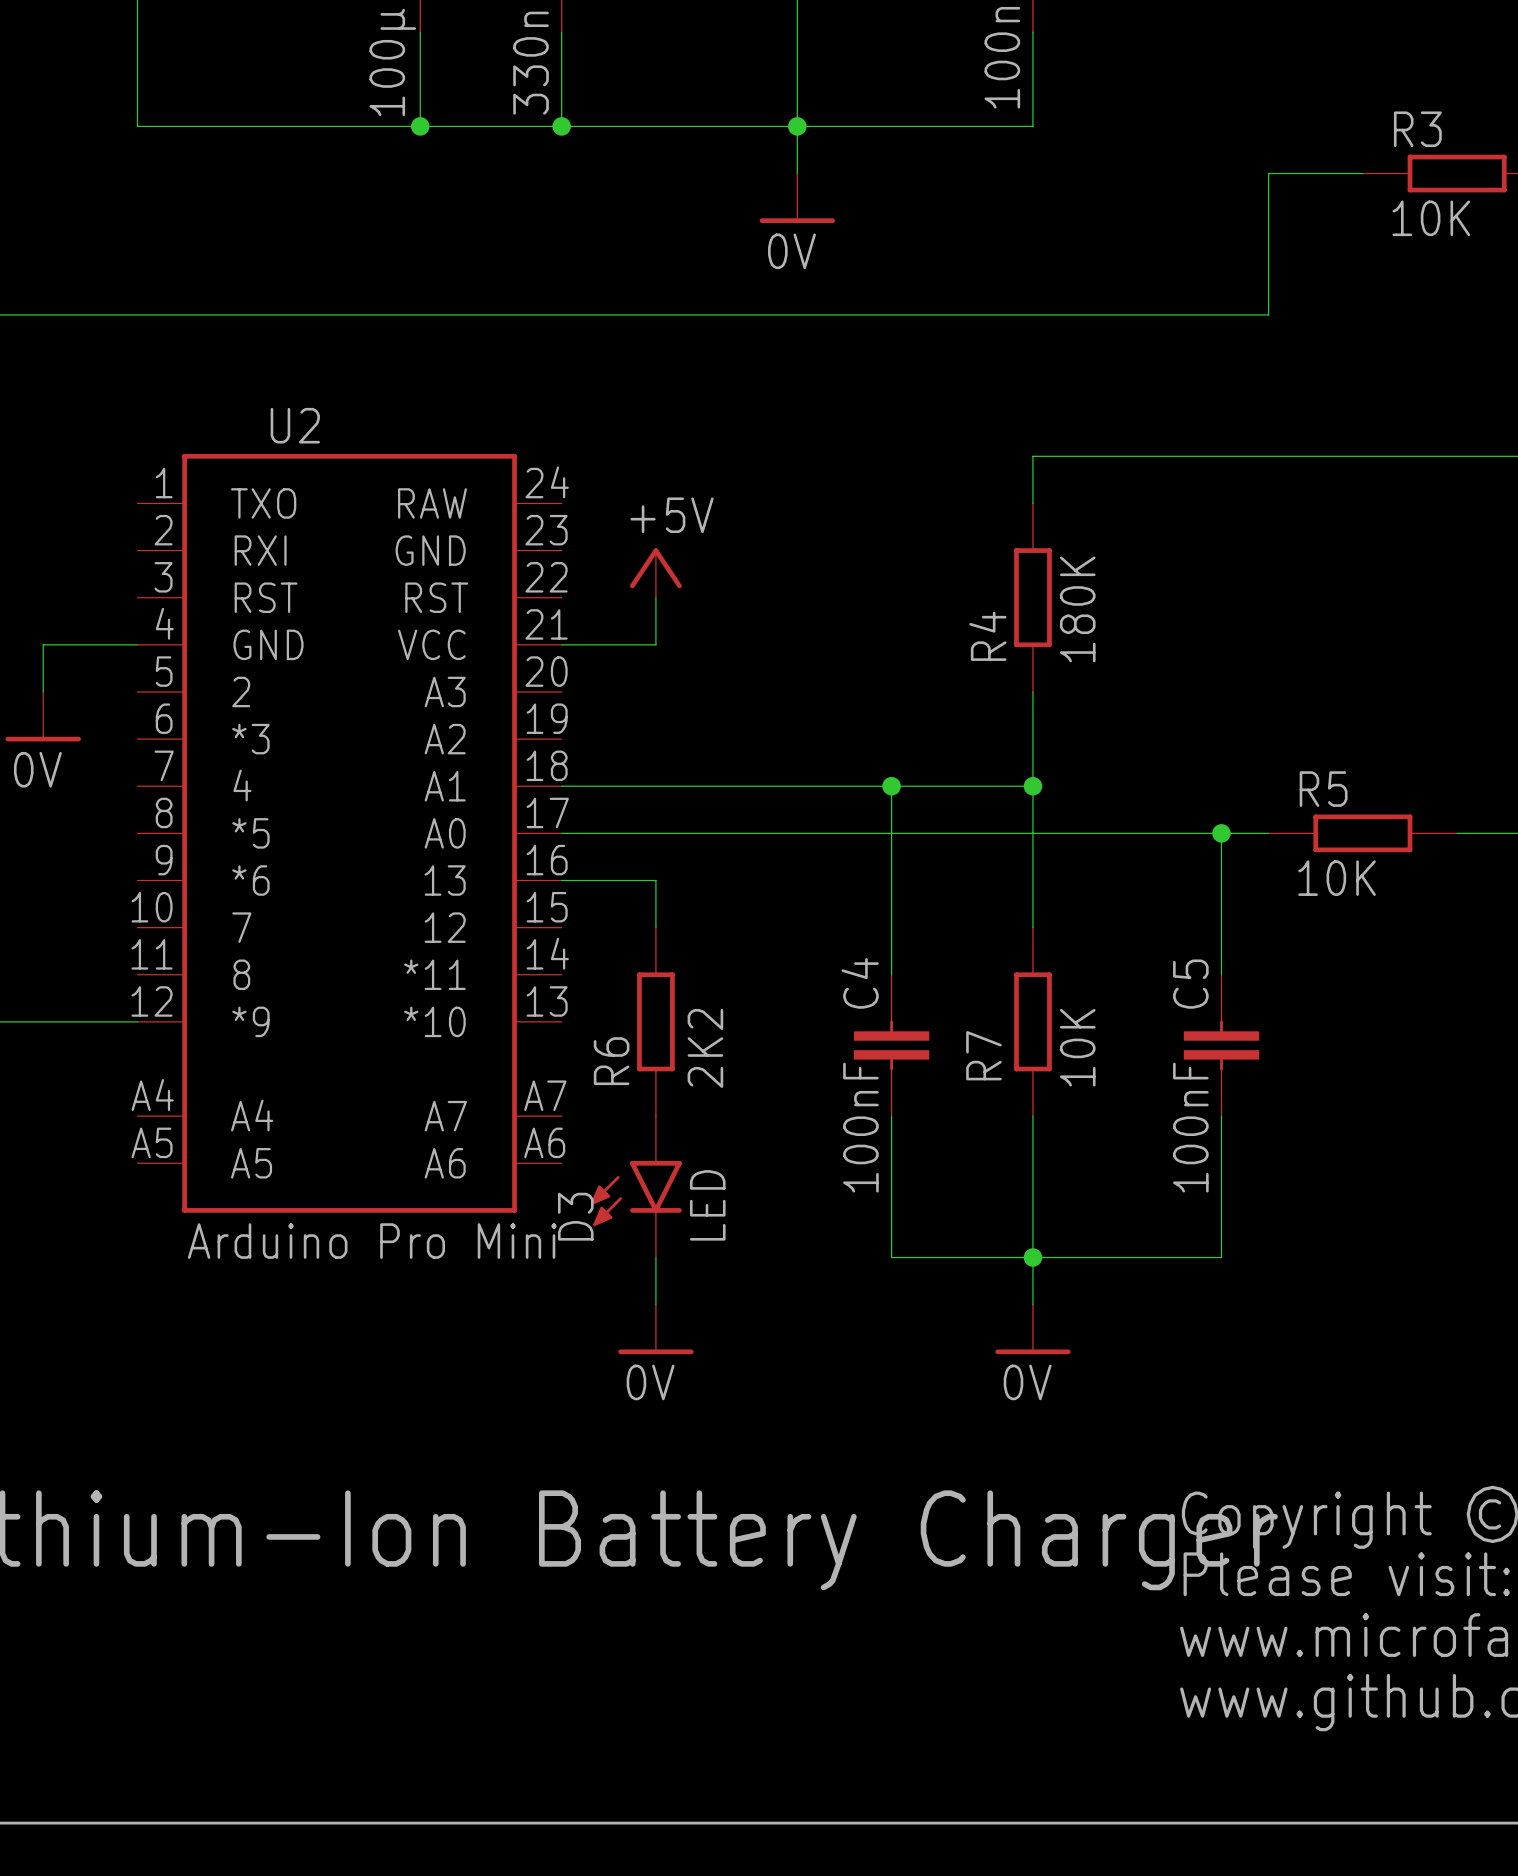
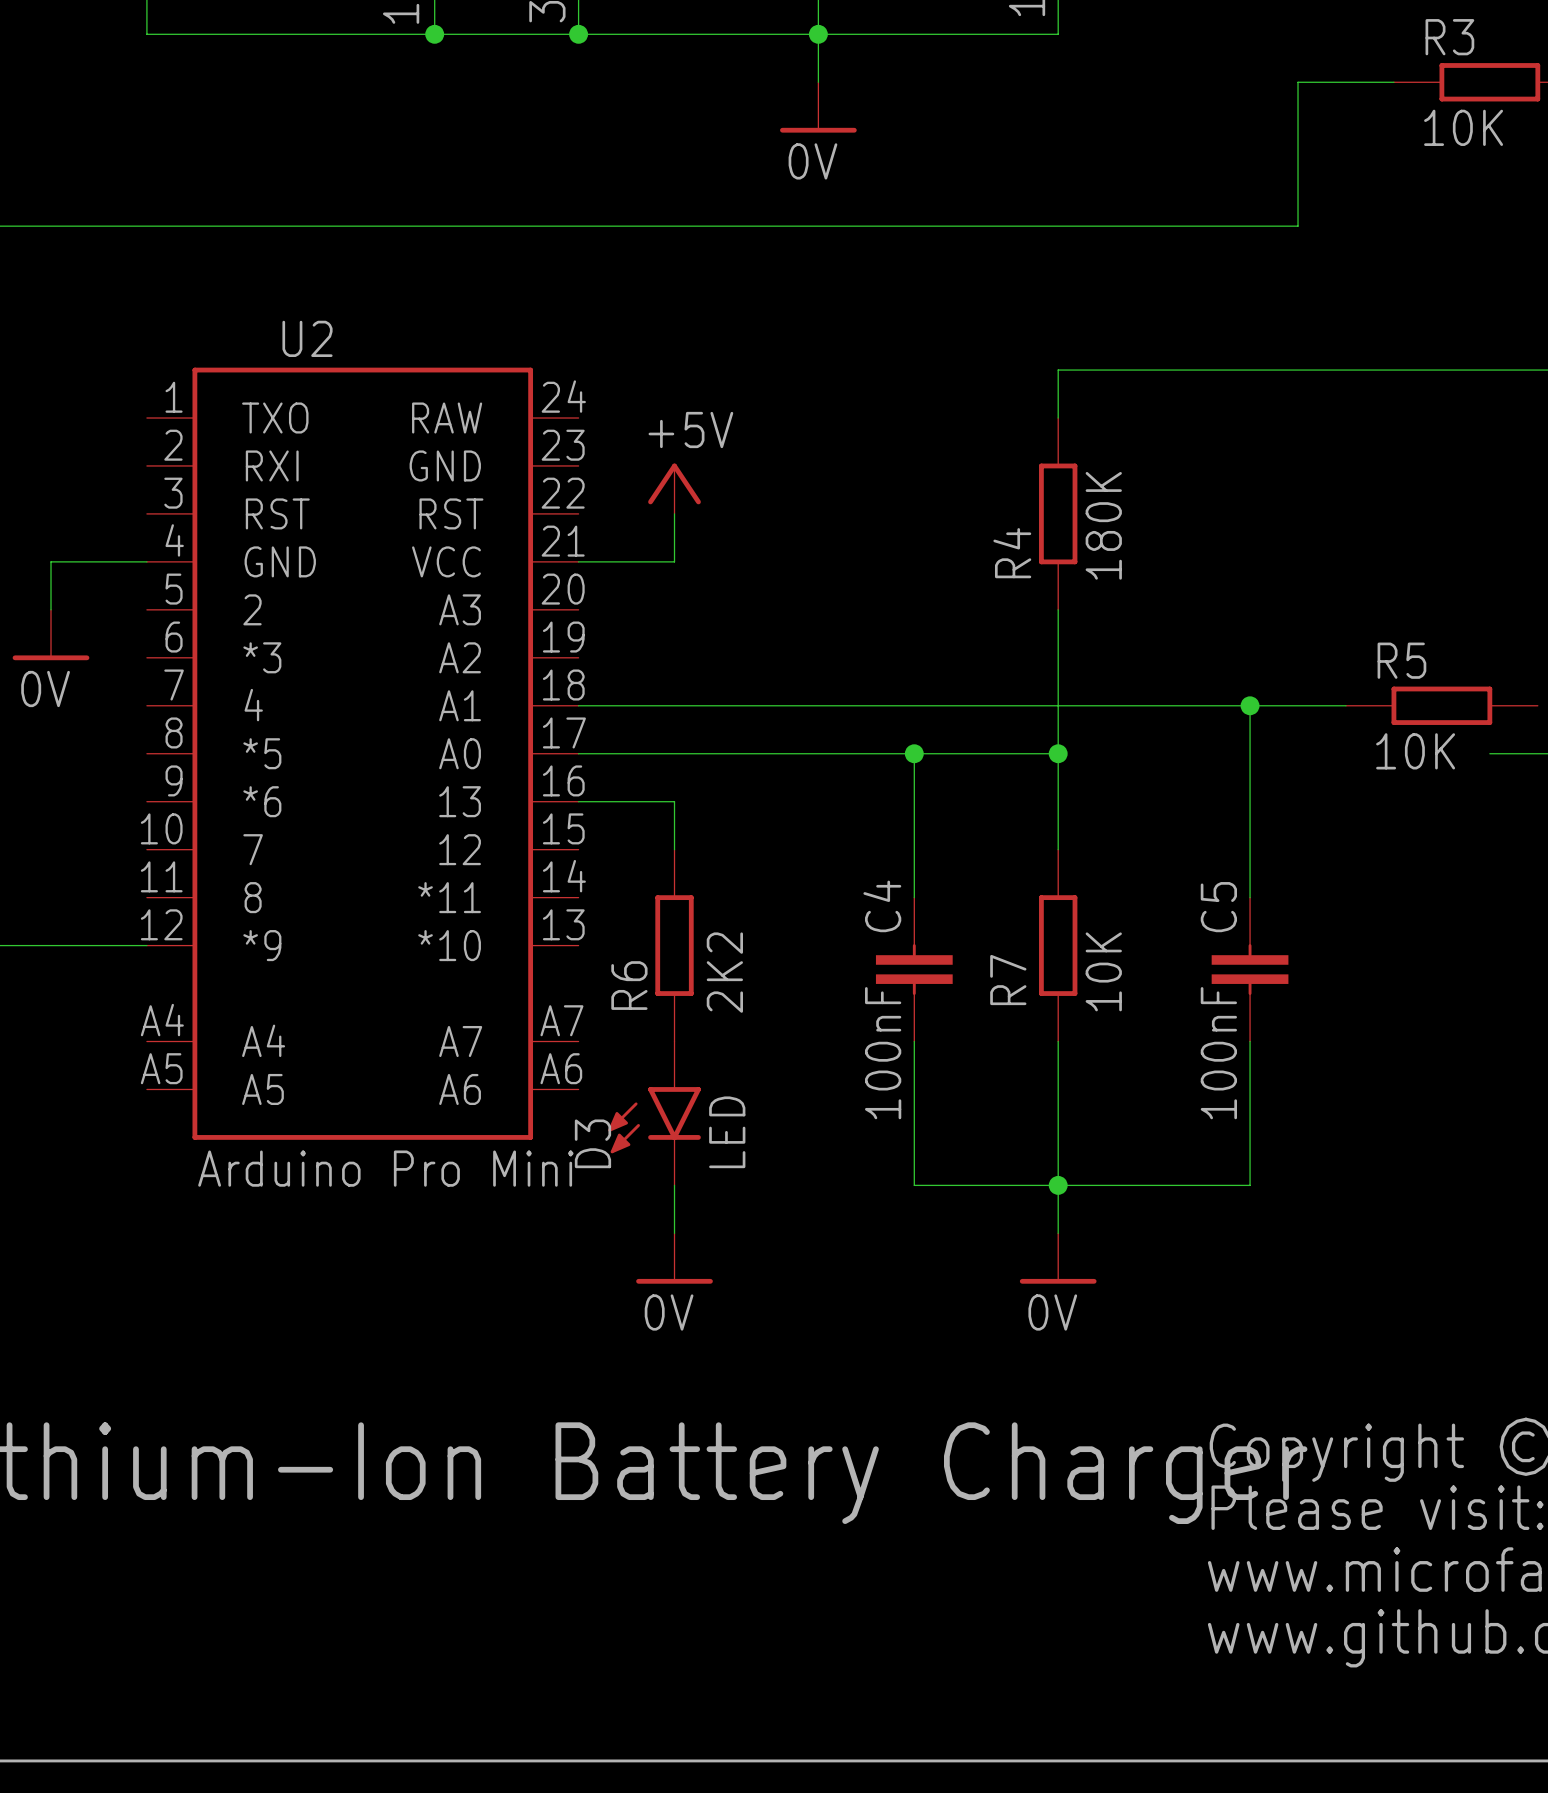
wire: (891, 786) (891, 833) -> (1250, 705) (1250, 753)
junction position: (891, 786) -> (914, 753)
wire: none -> (1058, 705) (1345, 705)
junction position: (1032, 786) -> (1058, 753)
wire: (1032, 833) (1268, 833) -> none
junction position: (1221, 833) -> (1250, 705)
R5 position: (1362, 833) -> (1441, 705)

